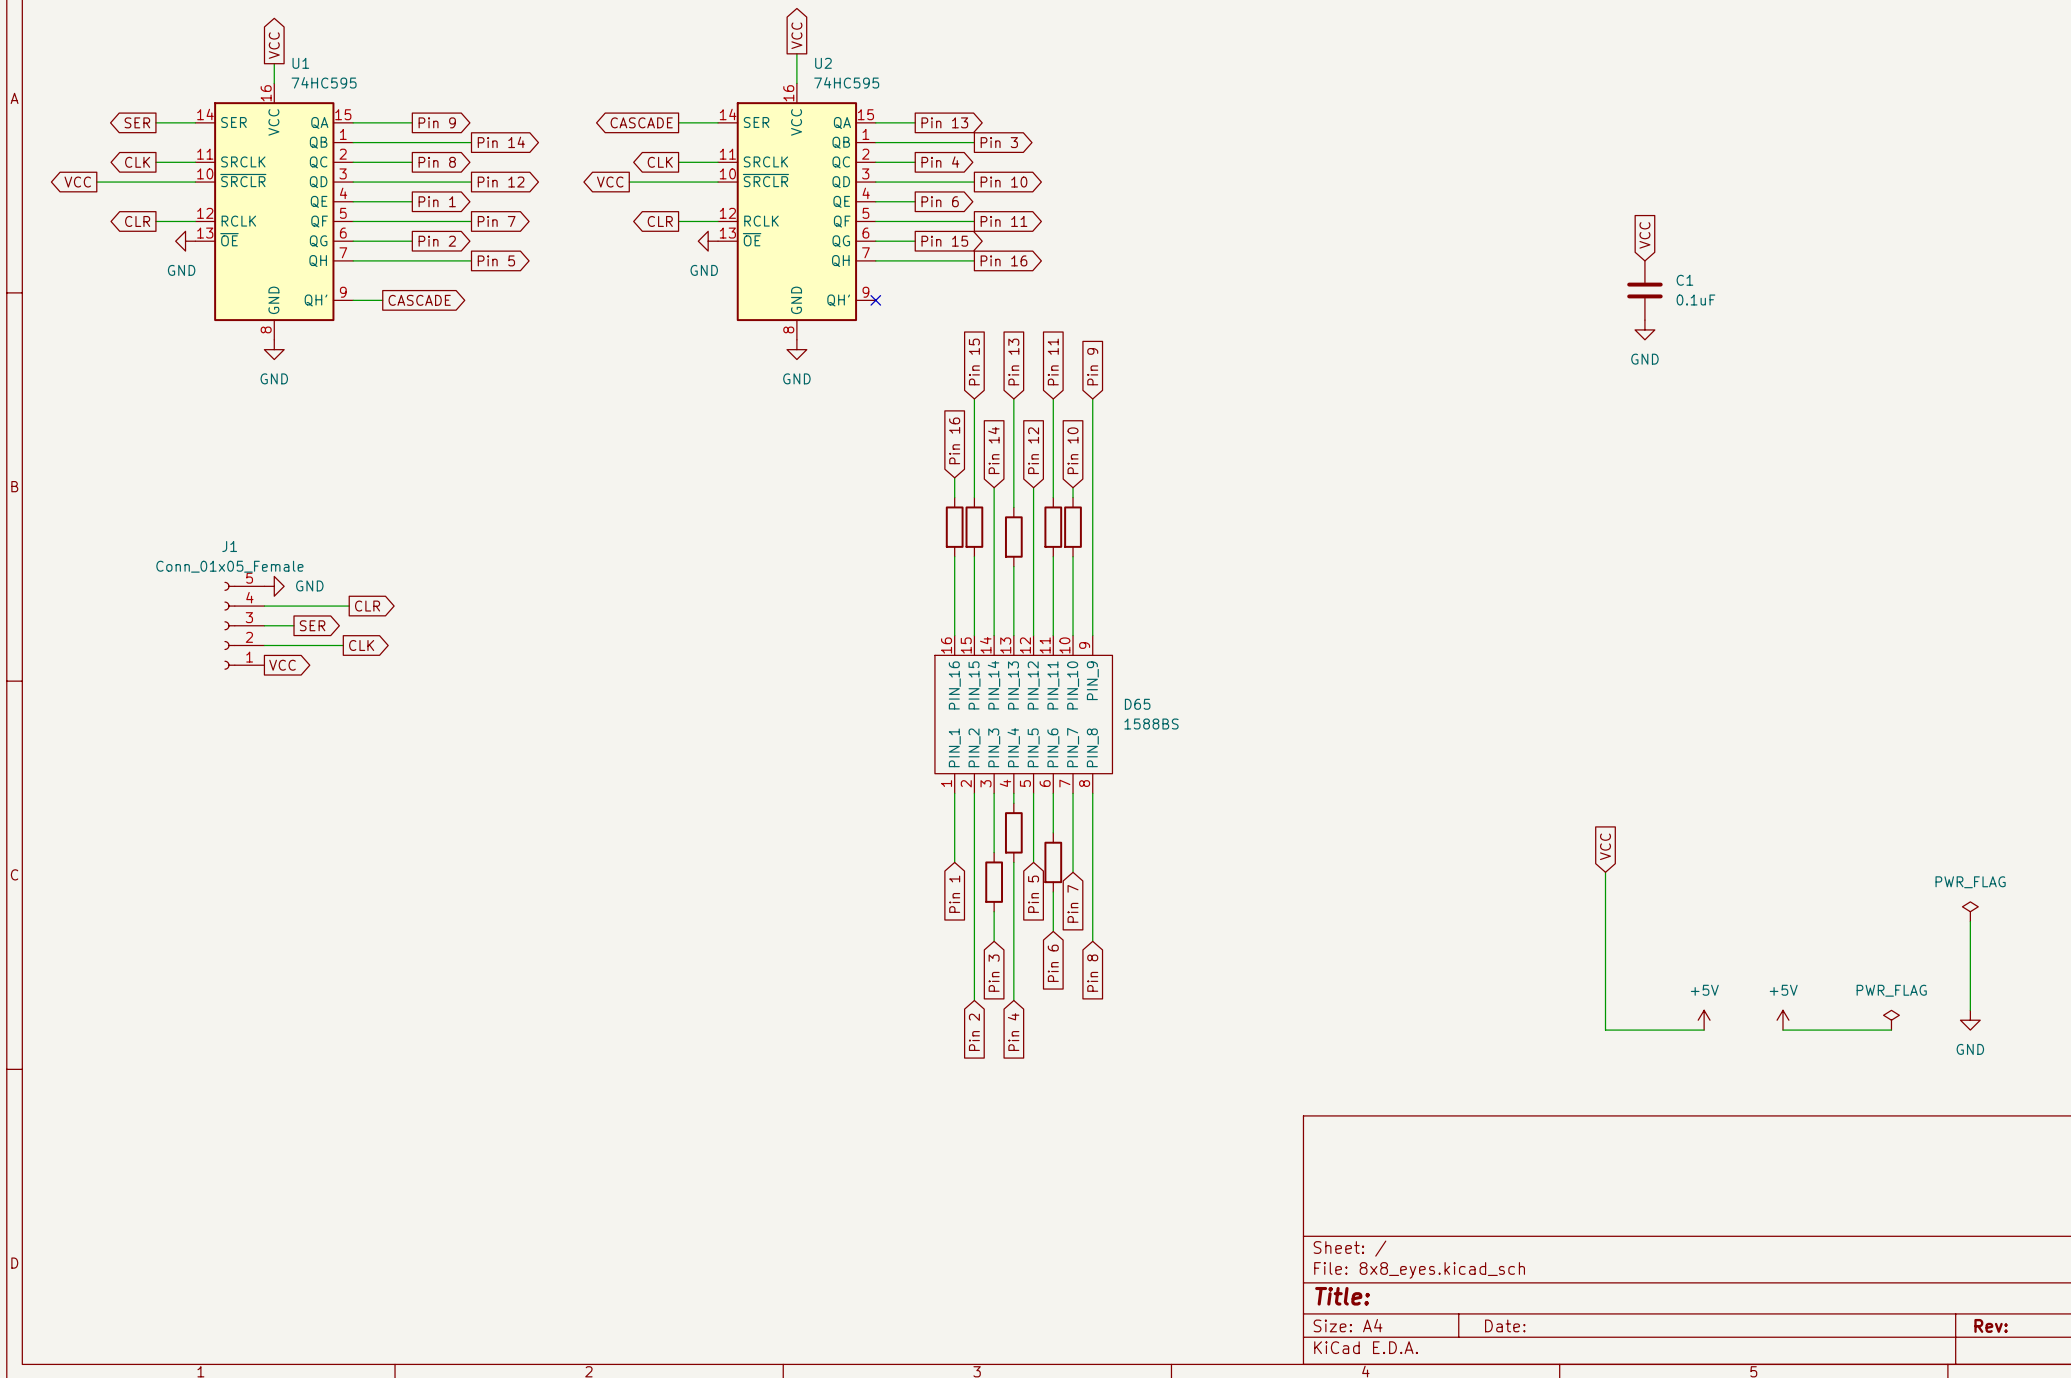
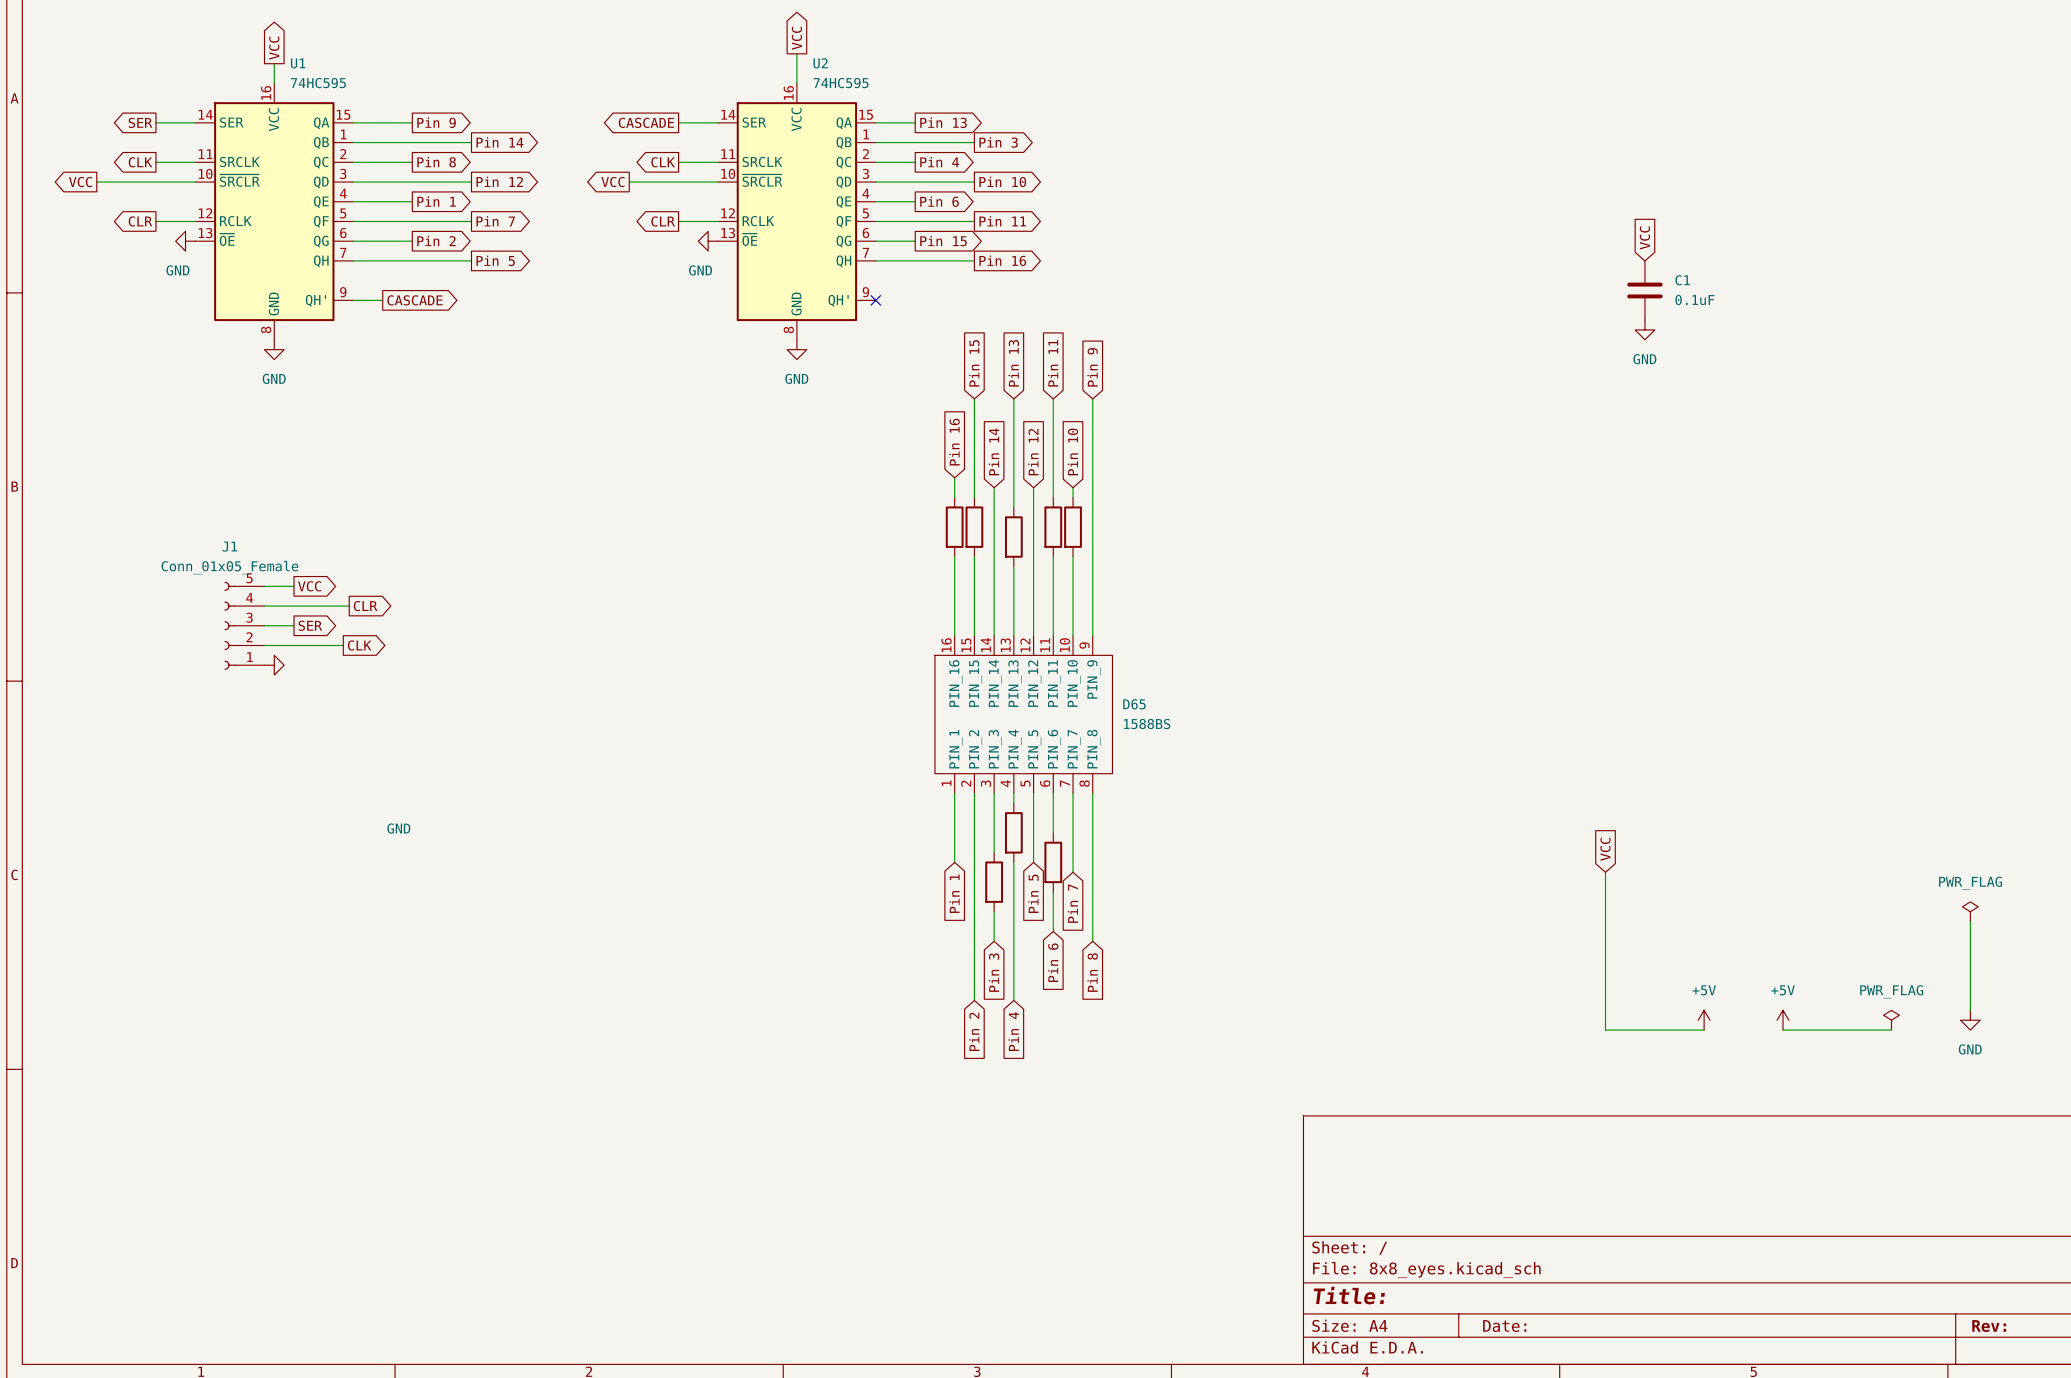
power symbol text position: GND (309, 585) -> GND (398, 828)
wire: none -> (264, 586) (294, 586)
power symbol position: GND (274, 586) -> GND (274, 665)
global label position: VCC (282, 665) -> VCC (309, 586)

